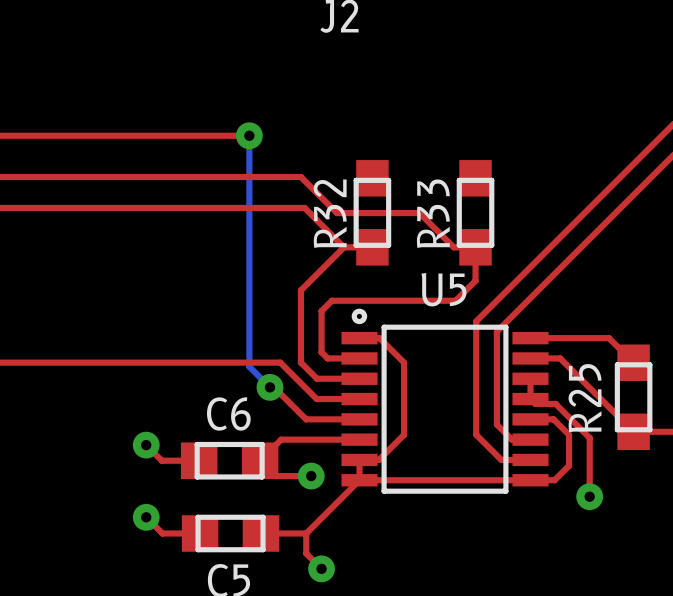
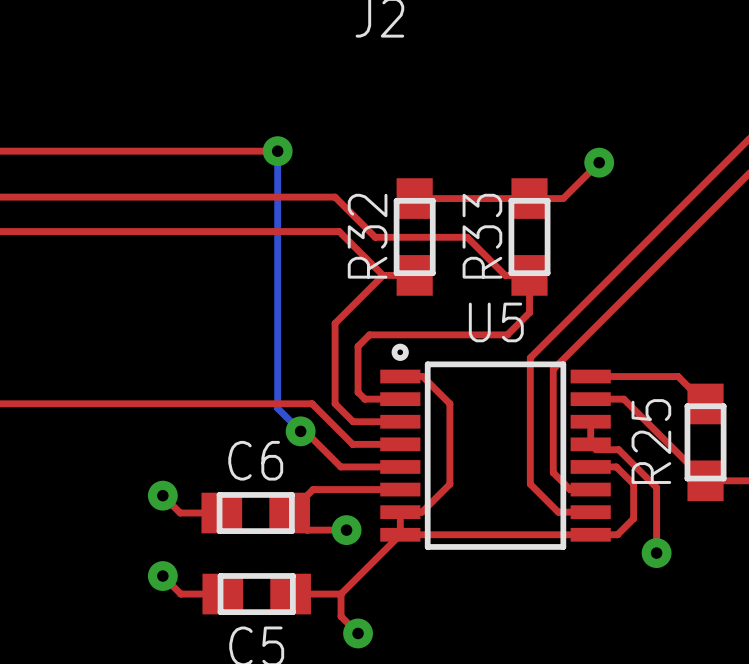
top track: none -> (599, 162) (563, 198) (414, 198)
via: none -> (599, 162)

